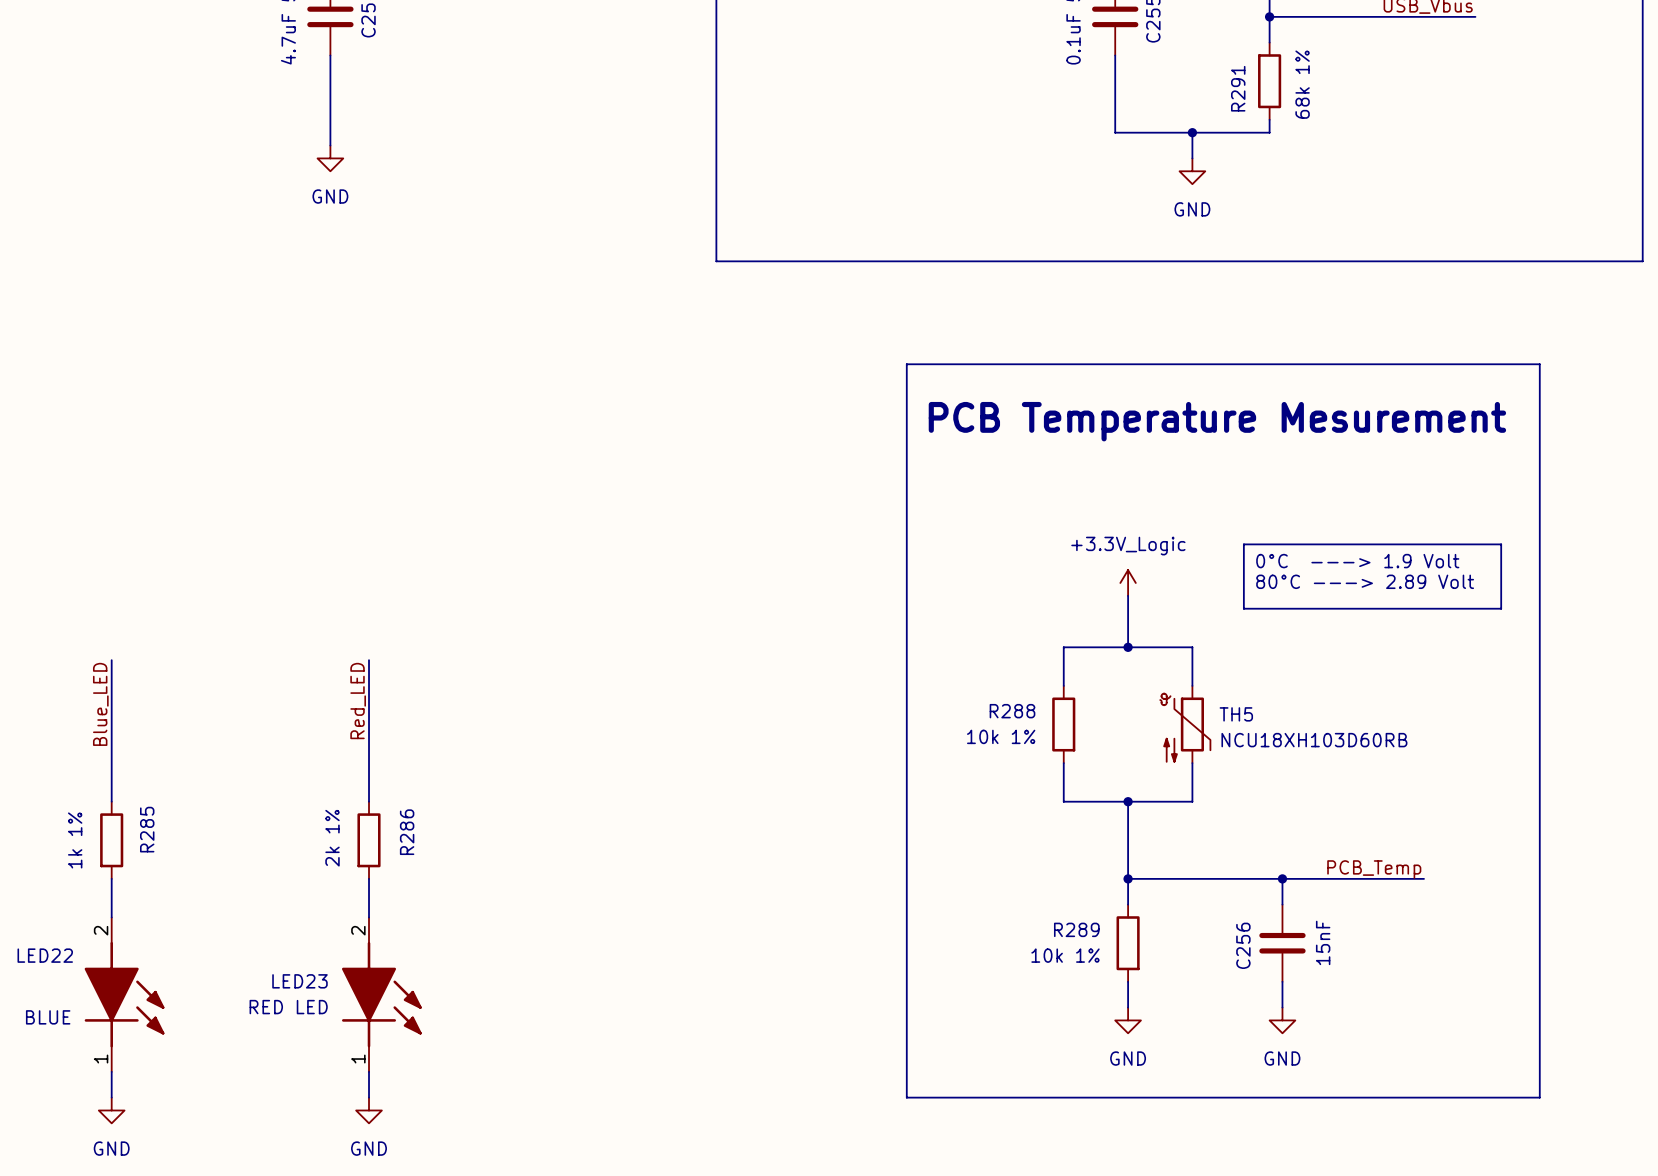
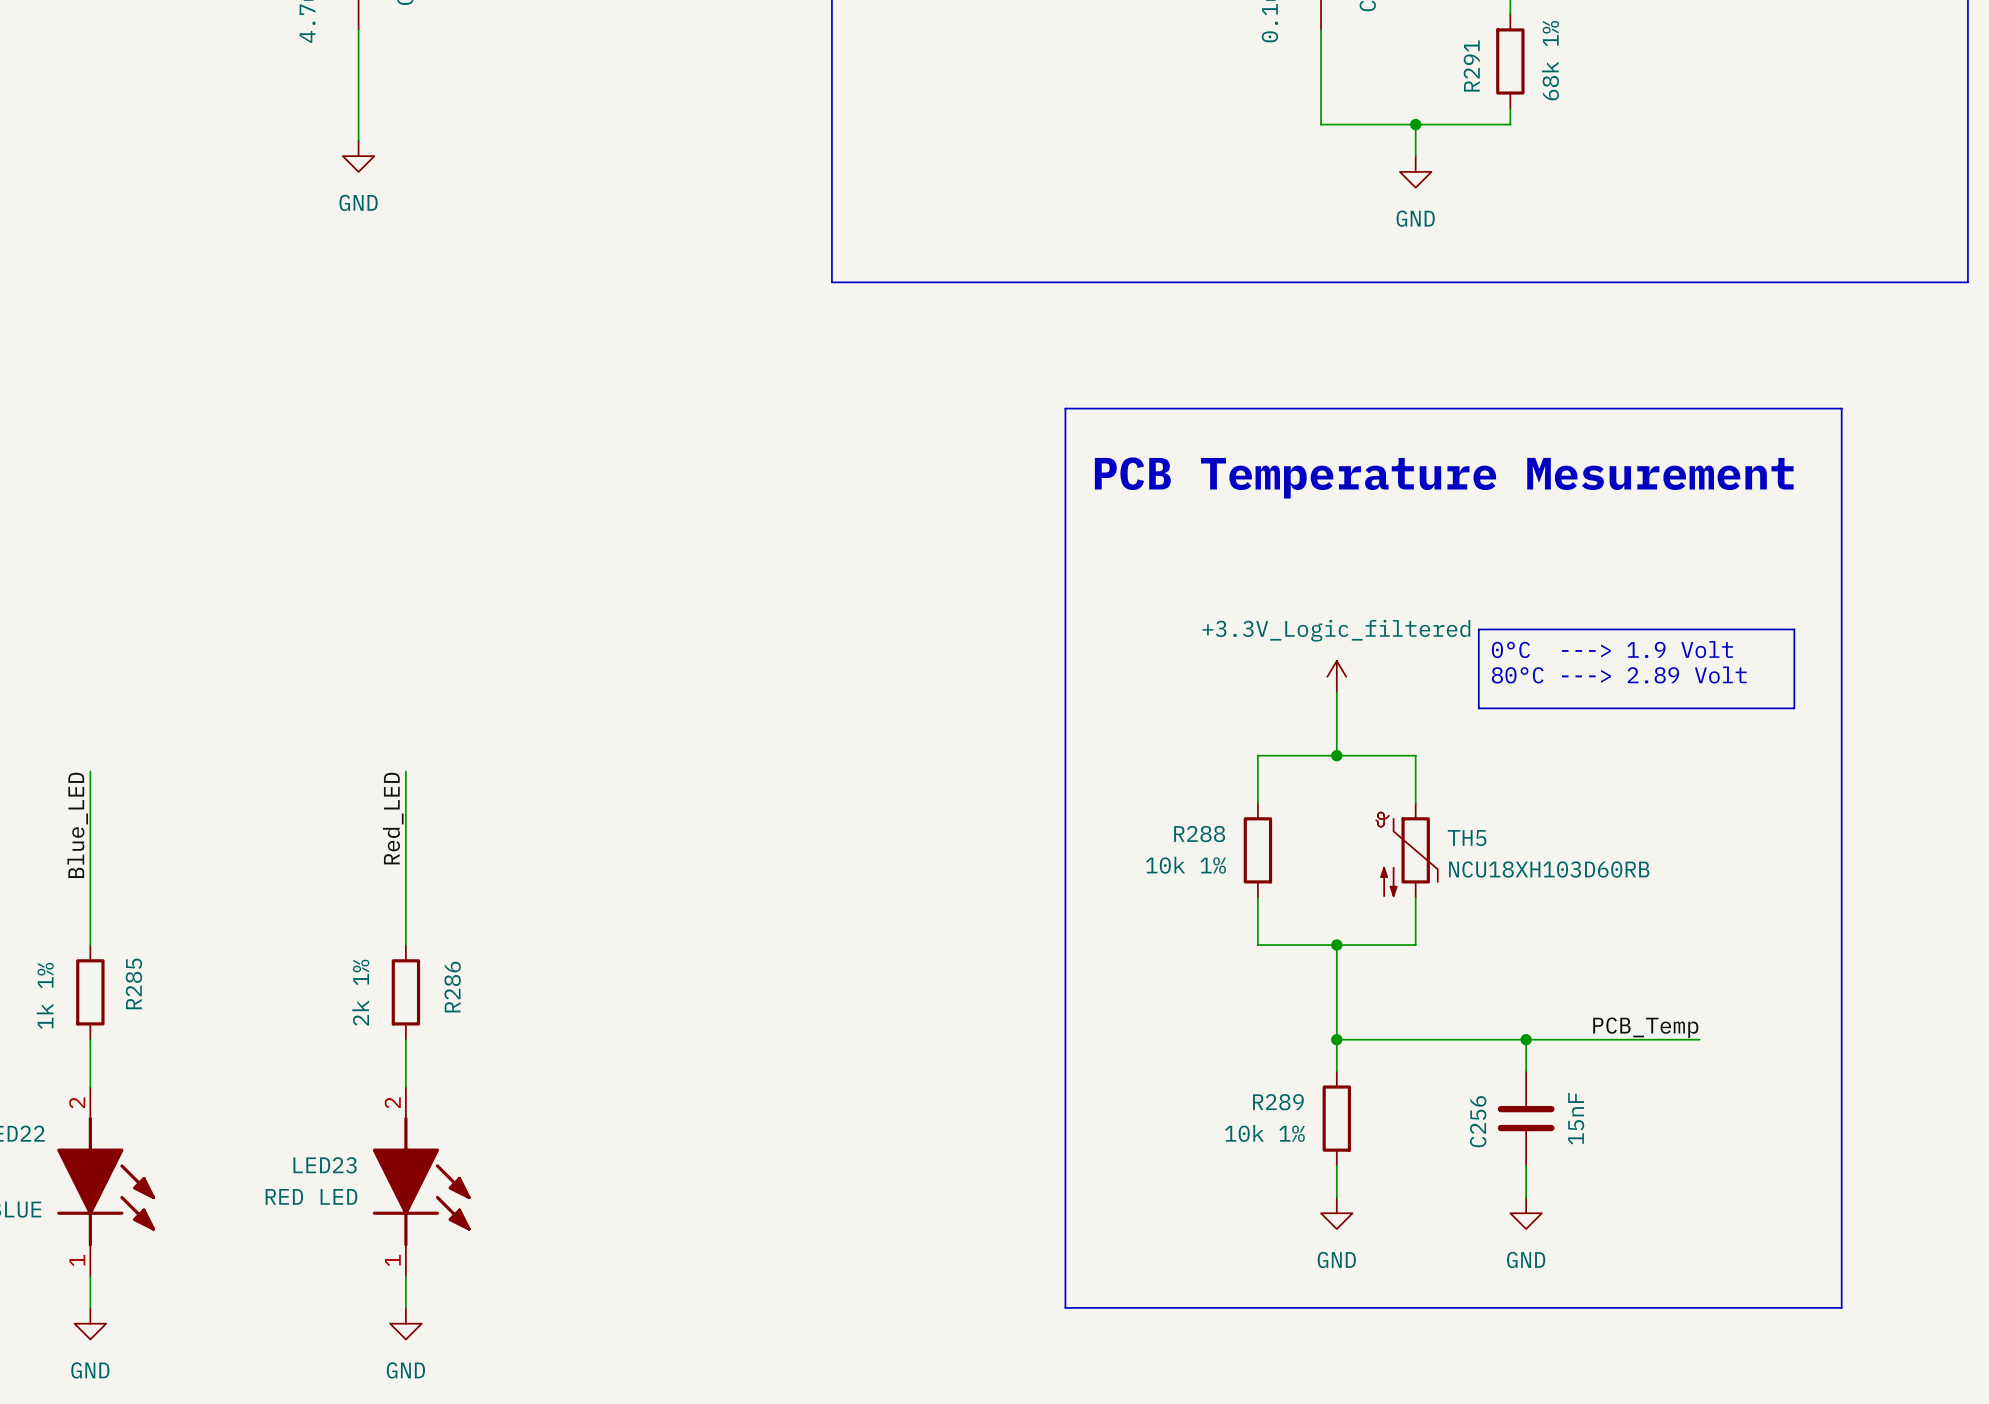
power symbol: +3.3V_Logic (1128, 582) -> +3.3V_Logic_filtered (1336, 676)

